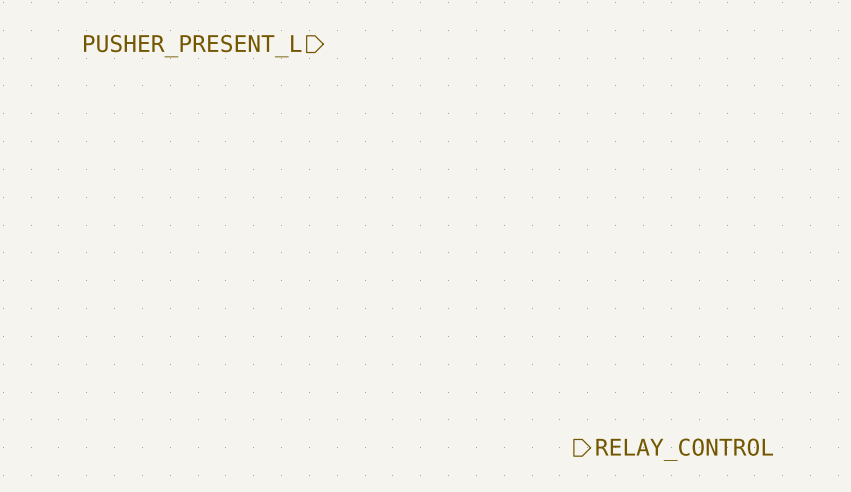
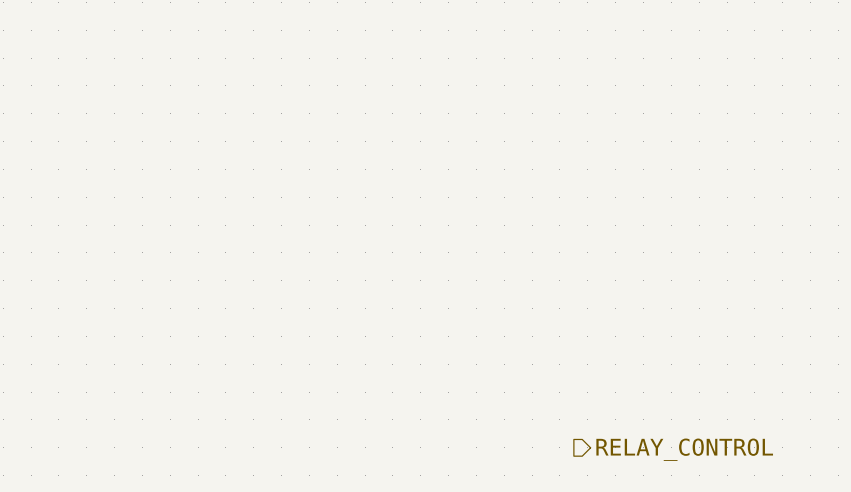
hierarchical label: PUSHER_PRESENT_L (192, 46) -> none

